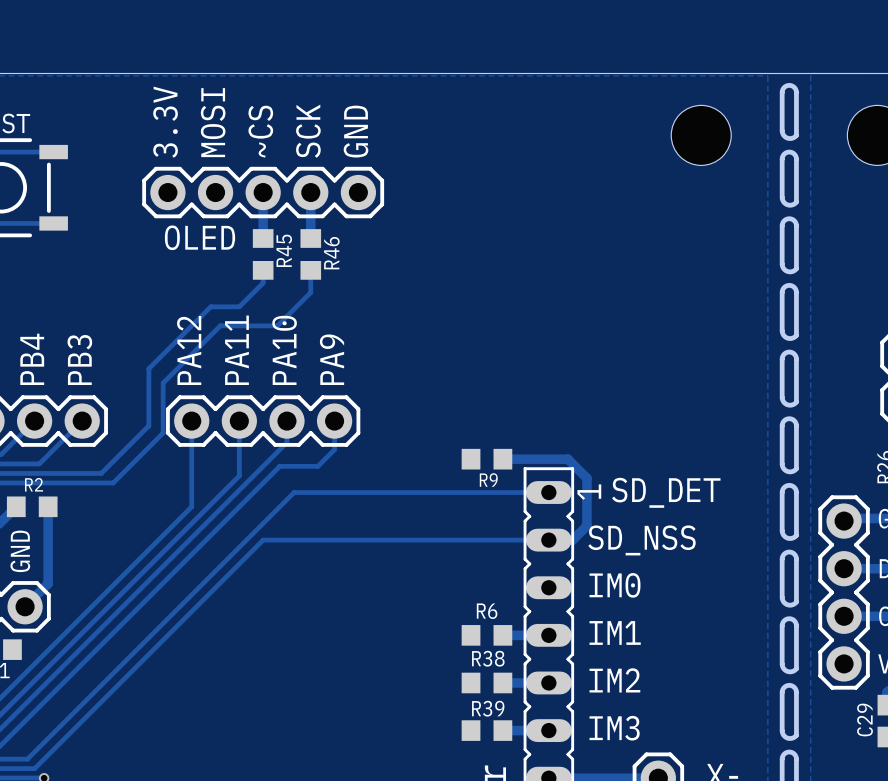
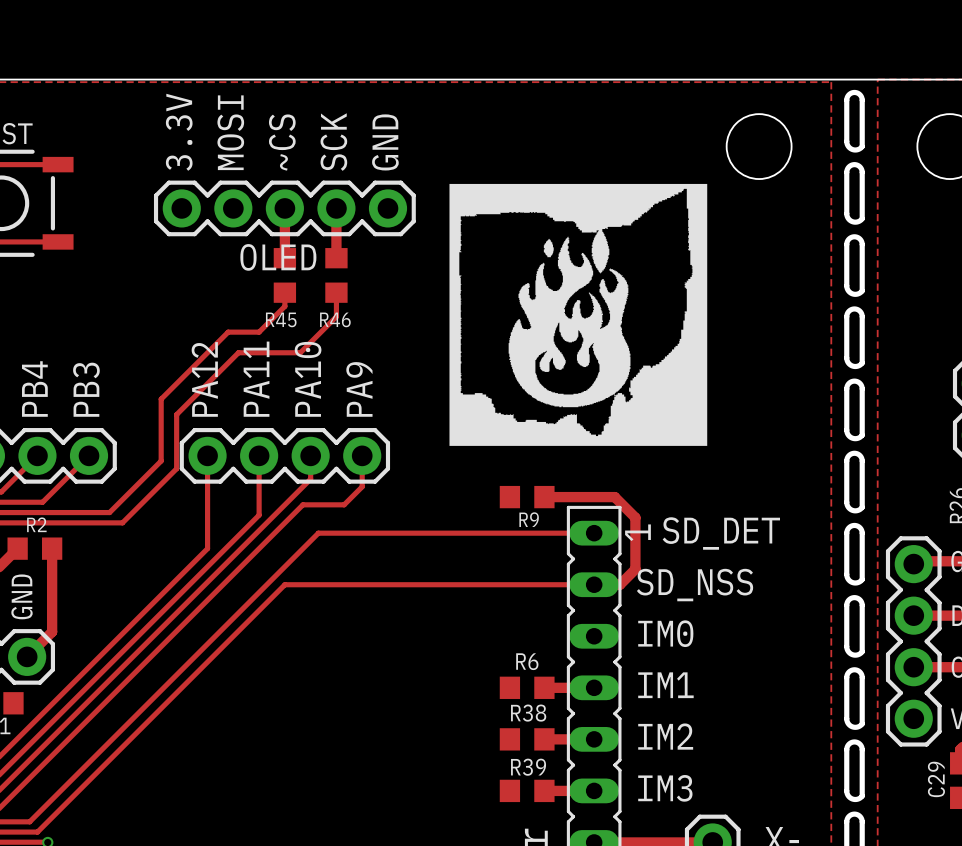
drawing: none -> [449, 183, 708, 446]
text position: OLED (200, 237) -> OLED (278, 257)
R45 name rotation: 0° (284, 250) -> 90° clockwise (281, 319)
R45 name position: R45 (284, 250) -> R45 (281, 319)
R46 name rotation: 0° (331, 253) -> 90° clockwise (335, 319)
R46 name position: R46 (331, 253) -> R46 (335, 319)

